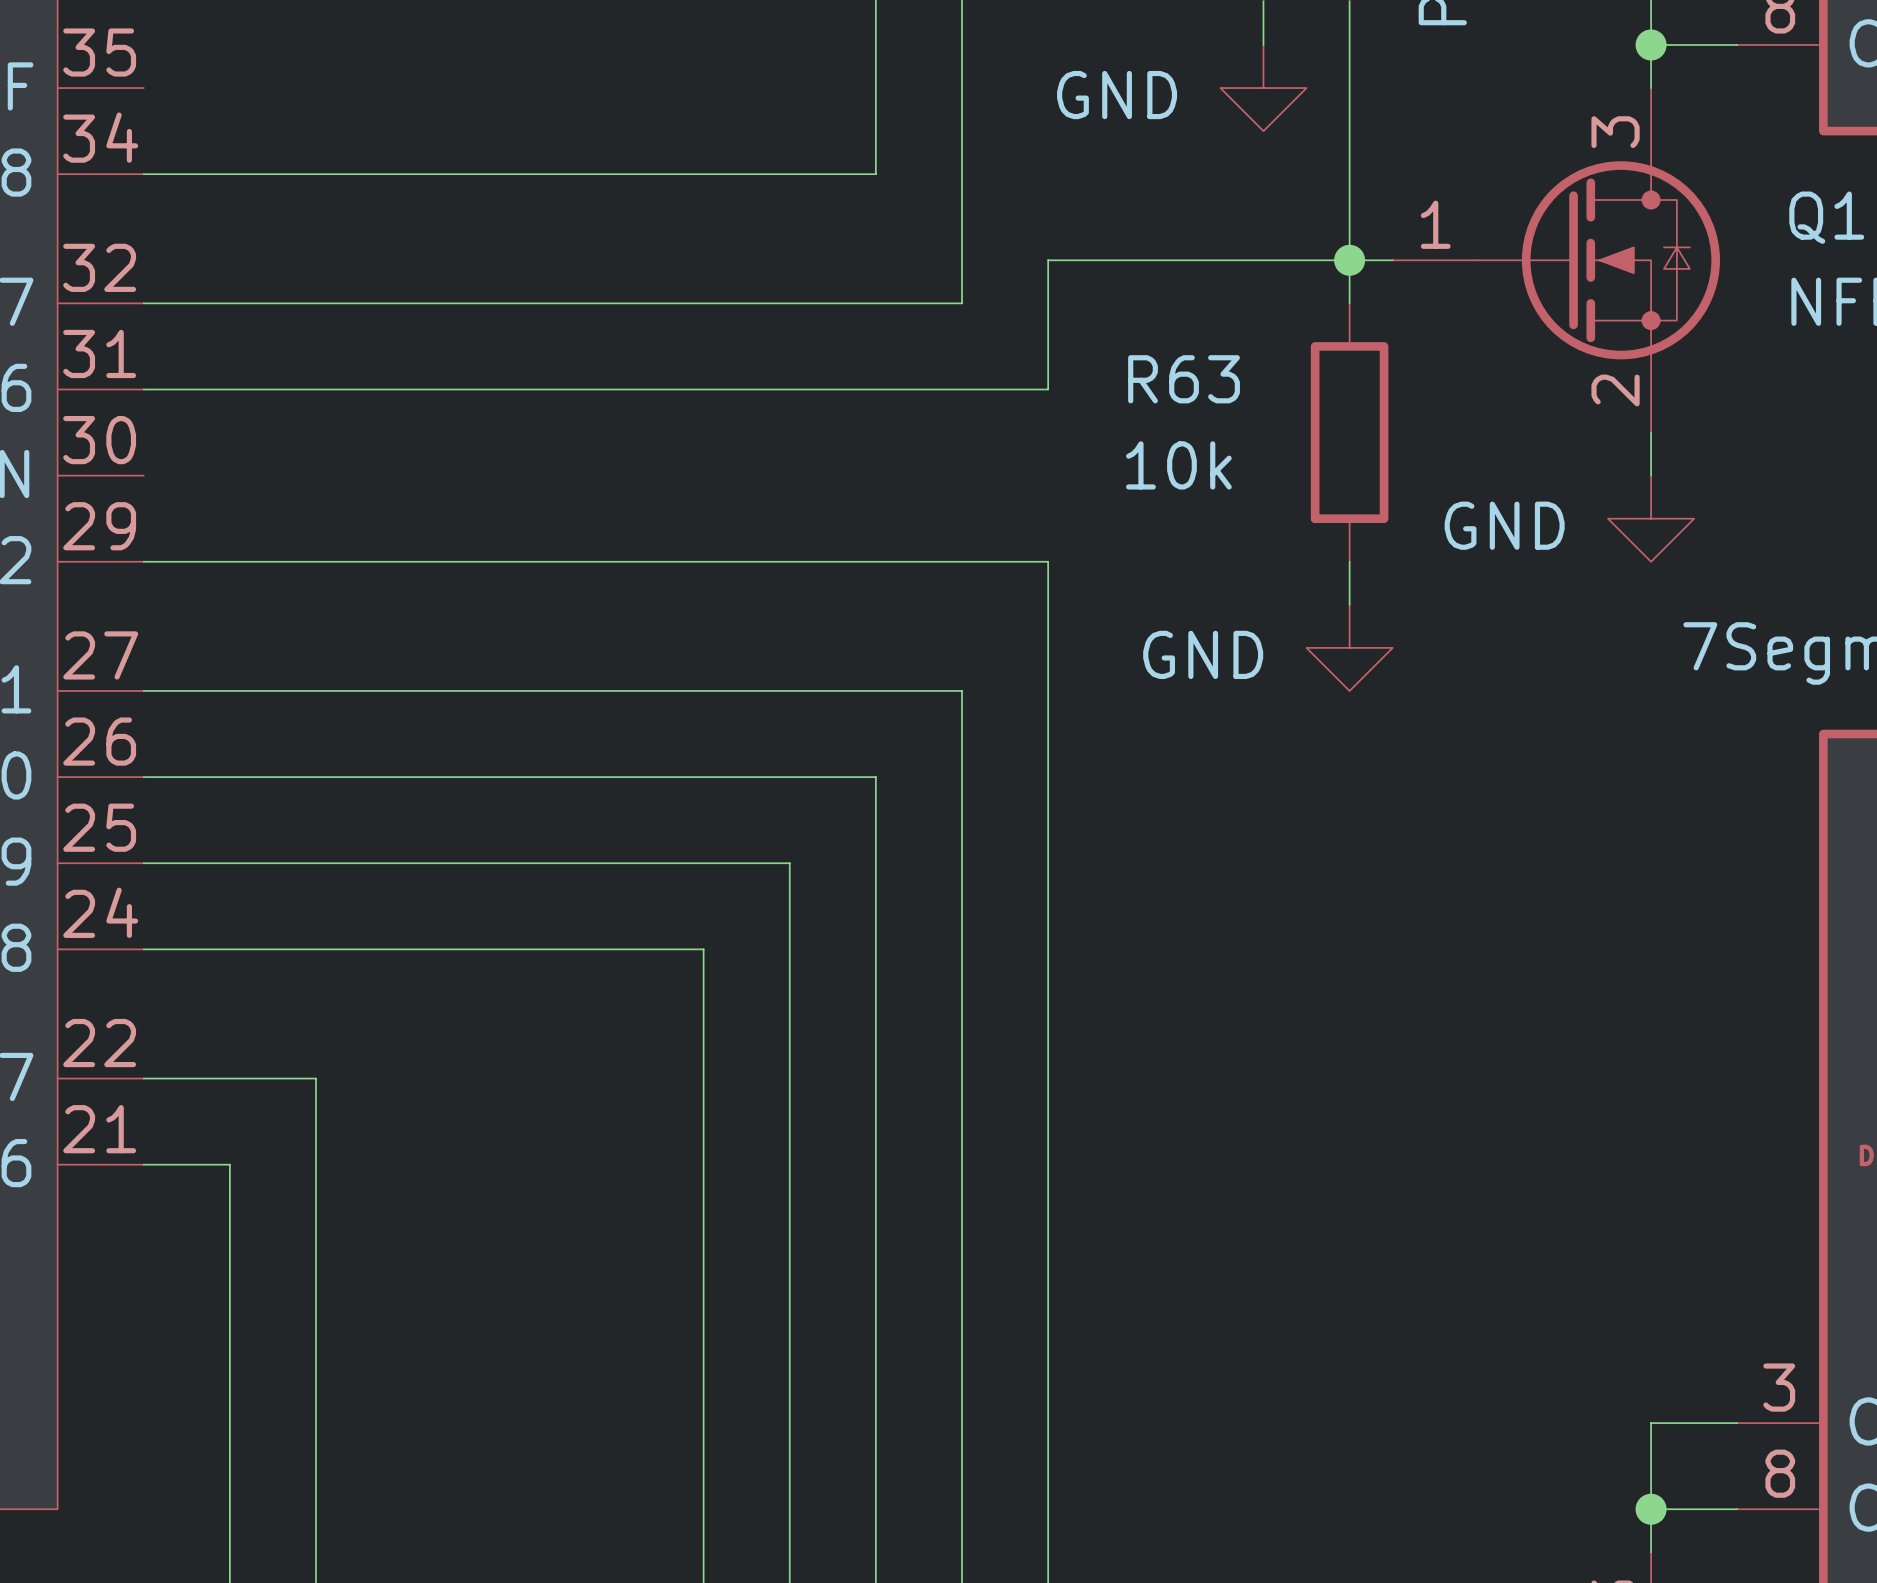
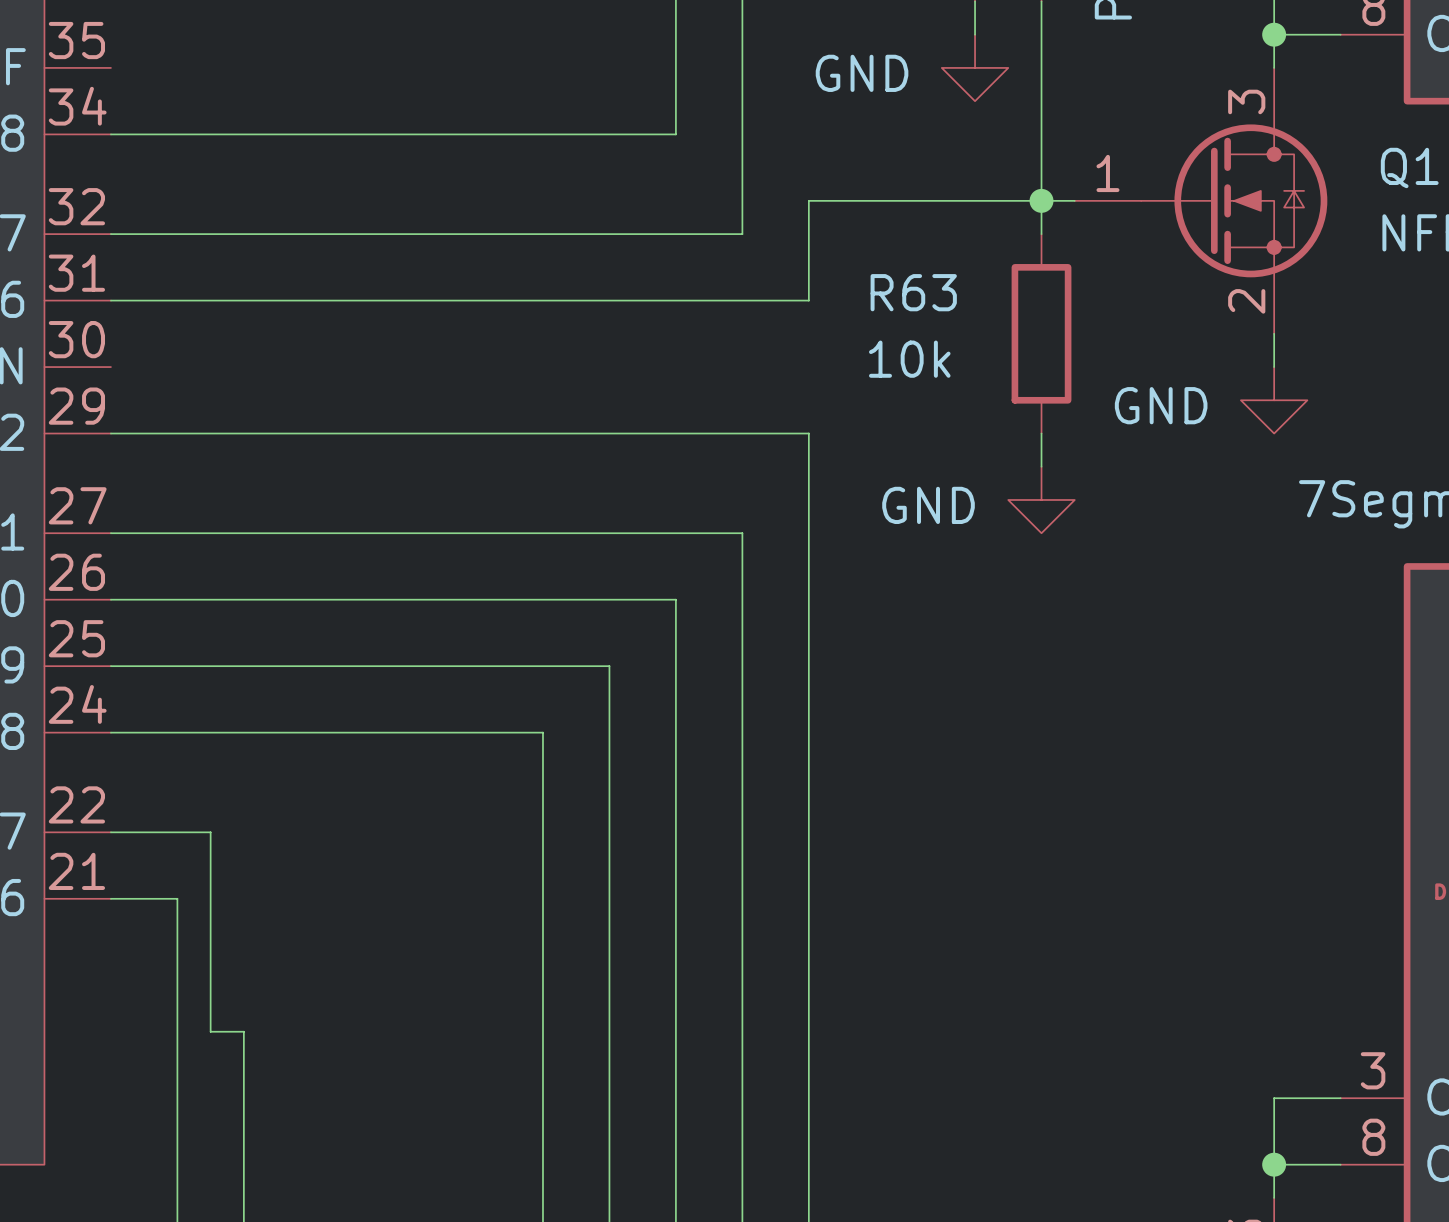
wire: (272, 1078) (316, 1078) (316, 1336) -> (210, 832) (210, 1031) (243, 1031)

